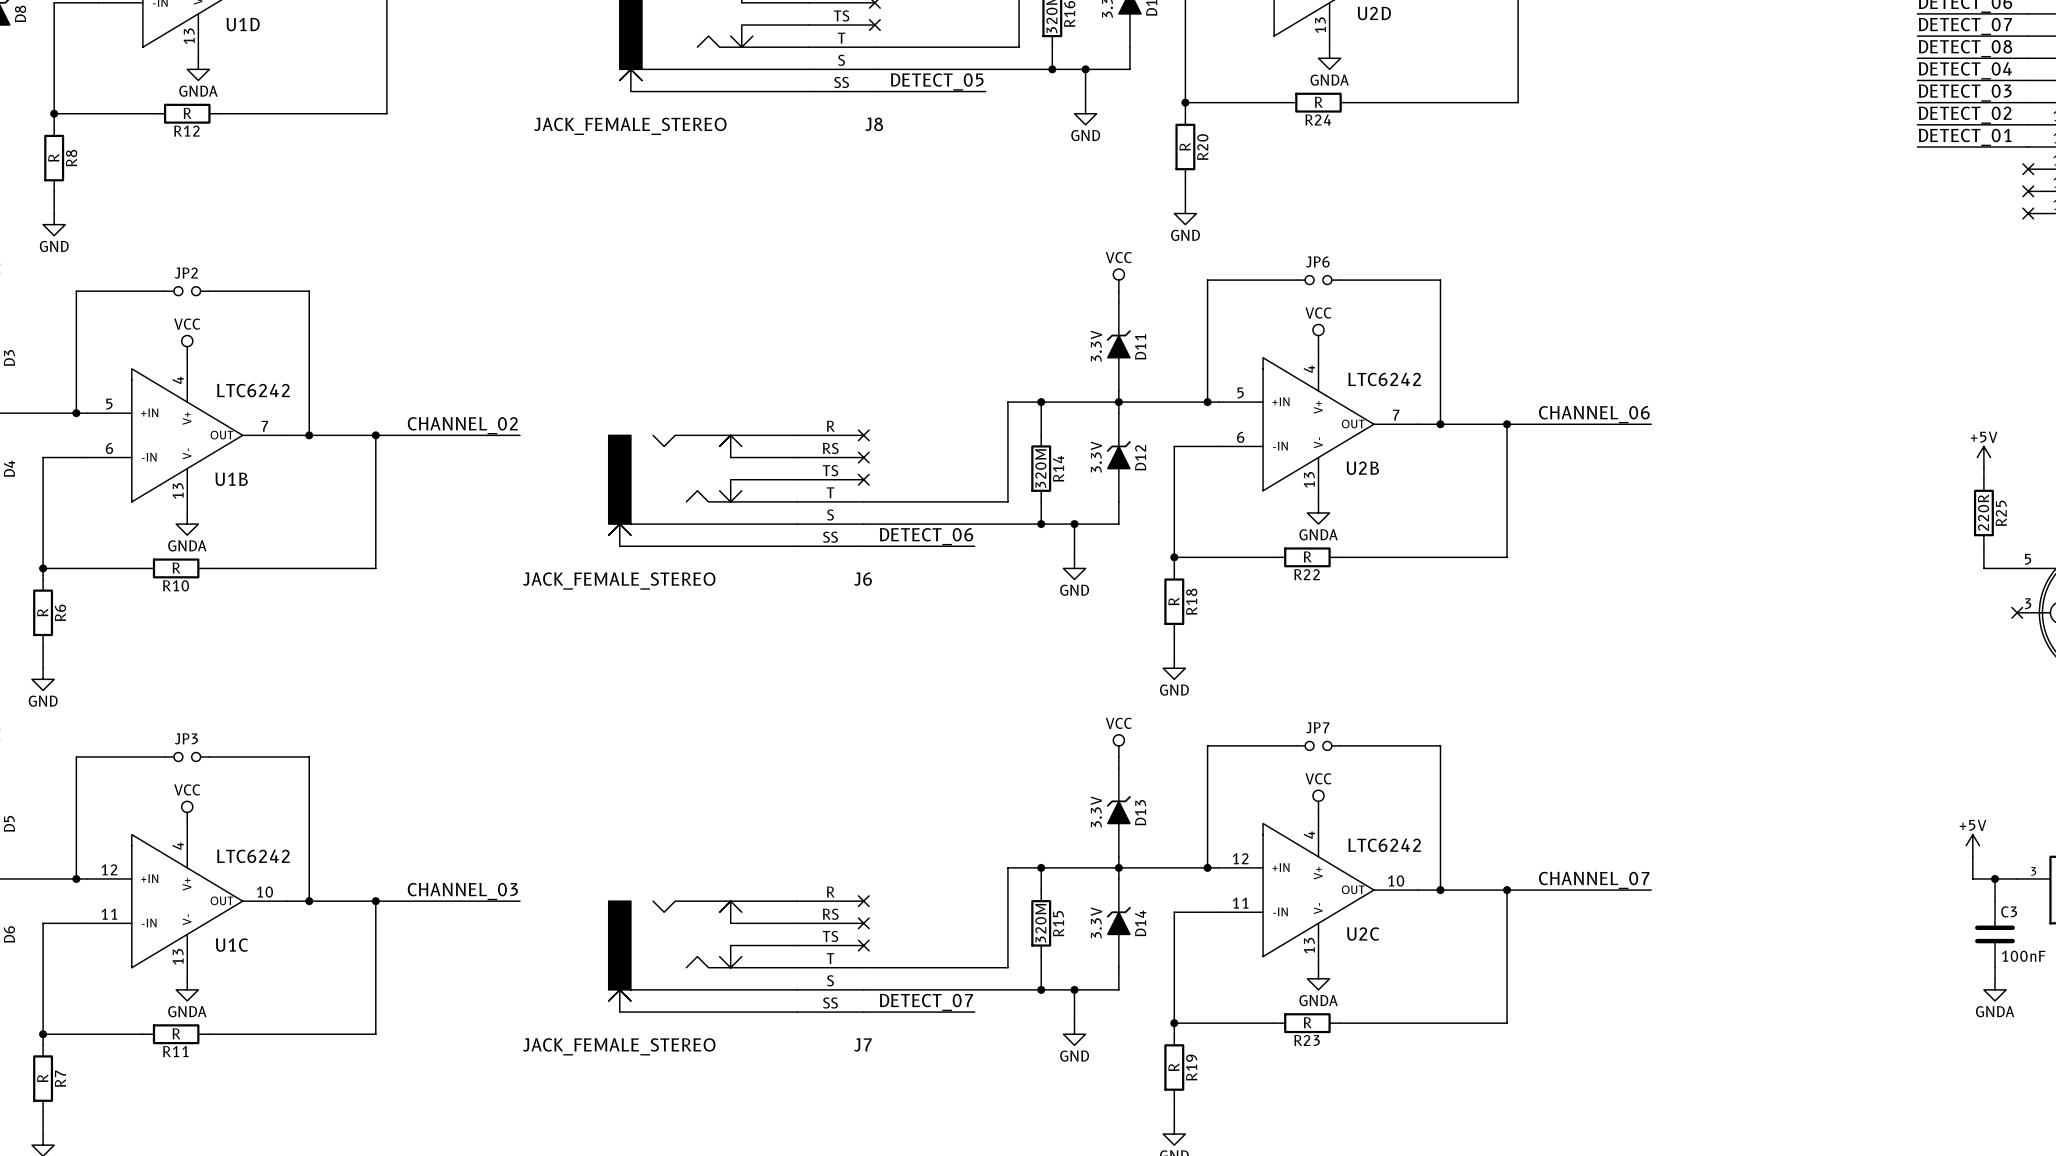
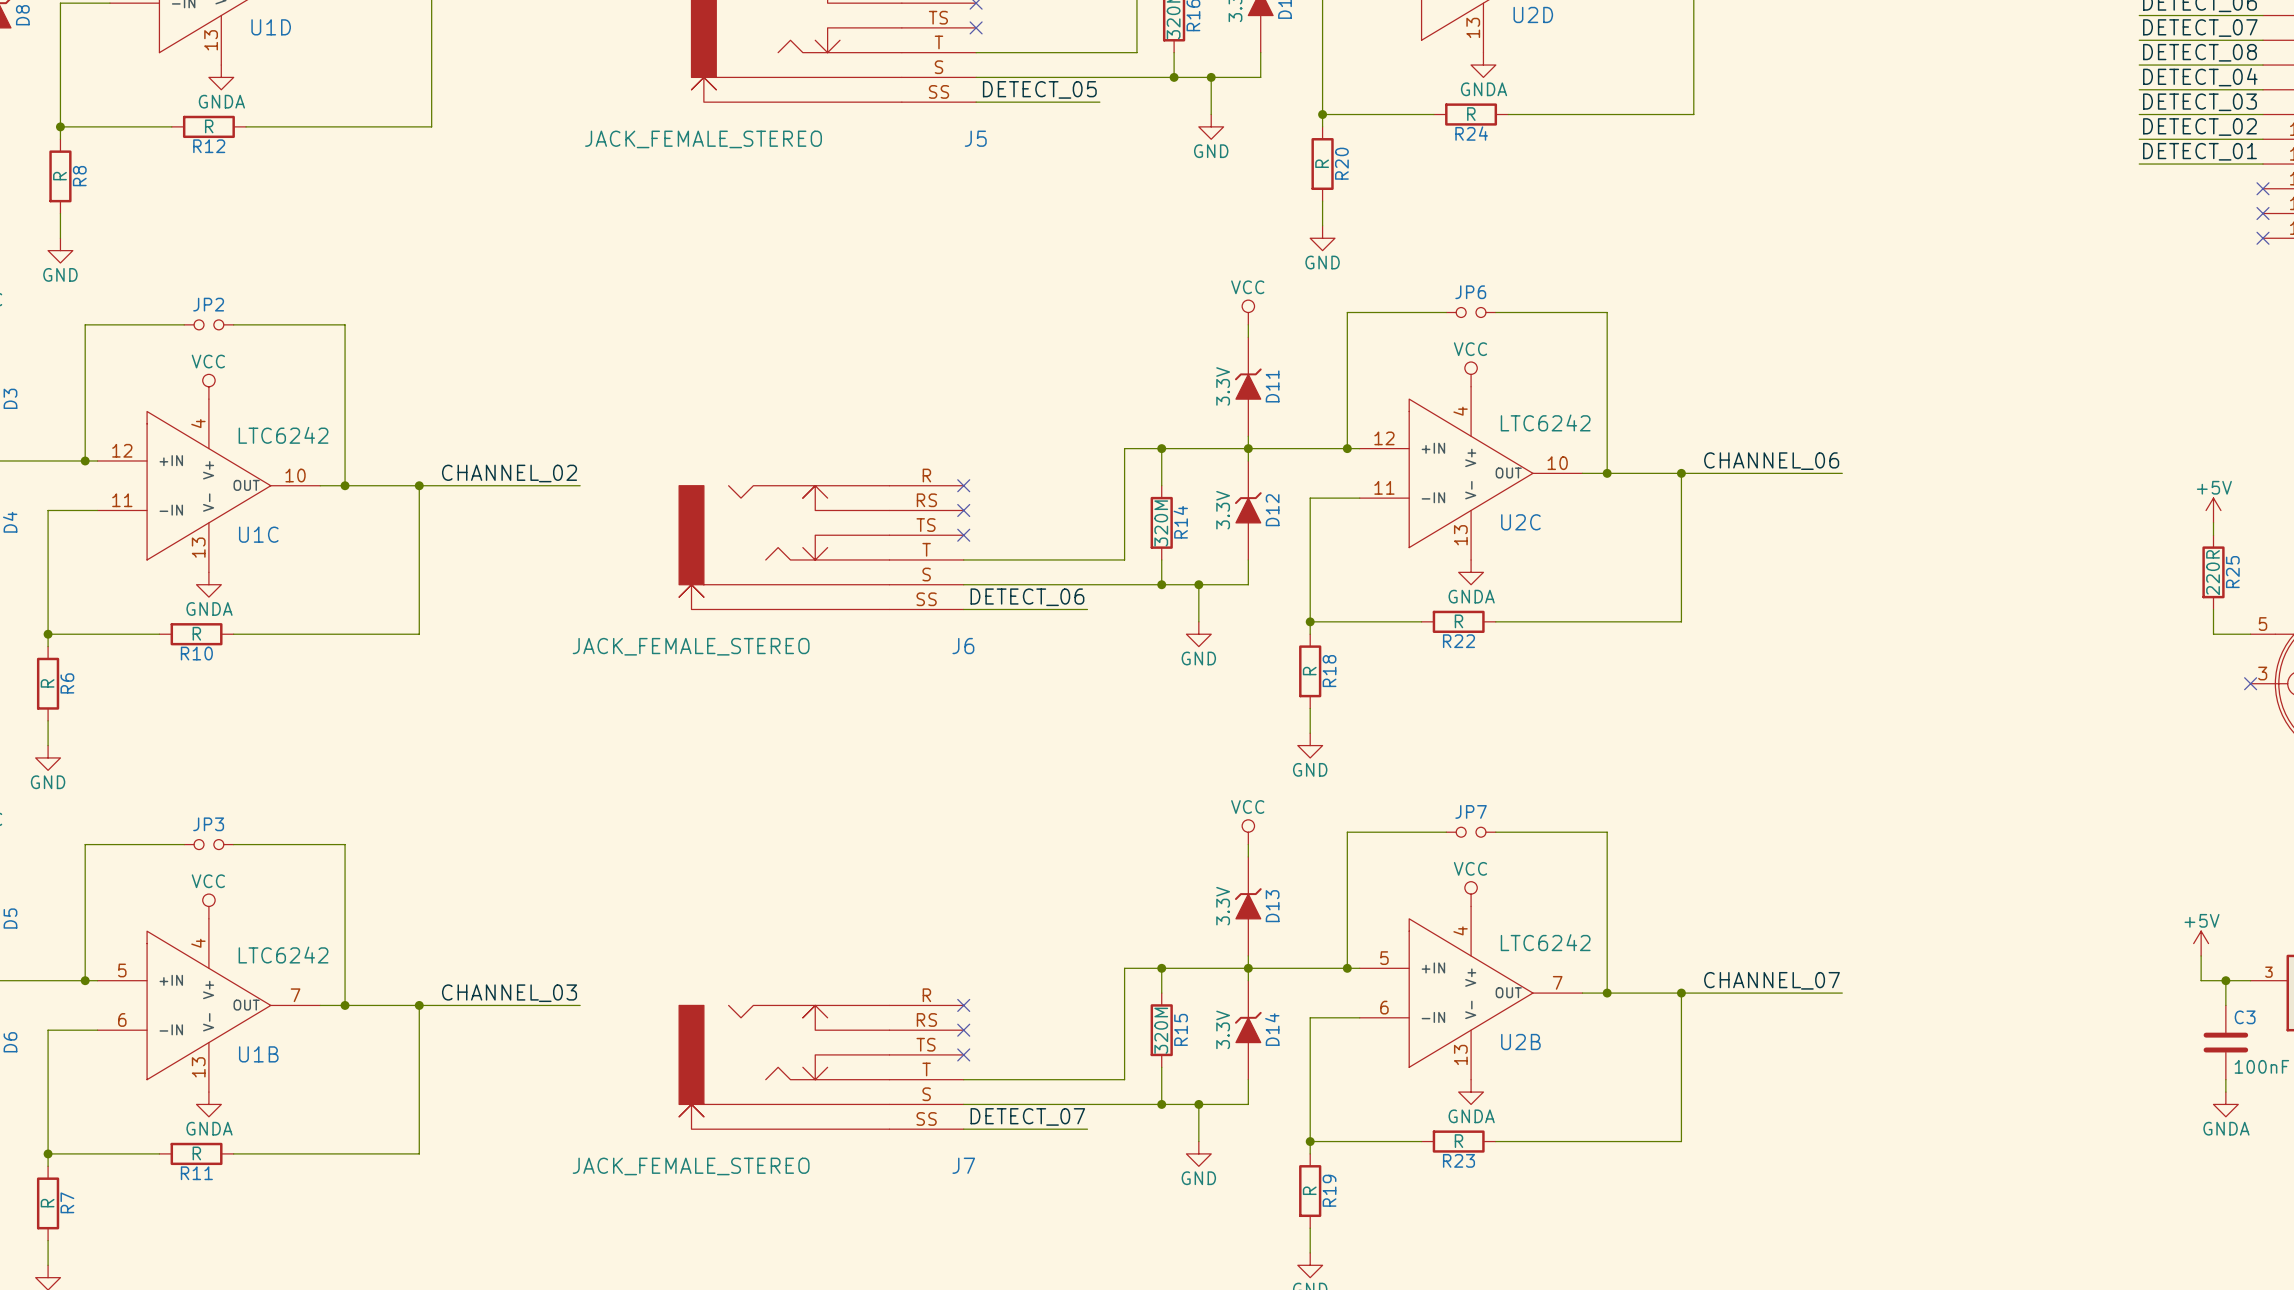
J8 name: J8 (874, 124) -> J5 (975, 138)
U2B position: (1318, 424) -> (1471, 993)
U1B position: (187, 435) -> (208, 1005)
U2C position: (1318, 890) -> (1471, 473)
U1C position: (187, 901) -> (208, 485)

